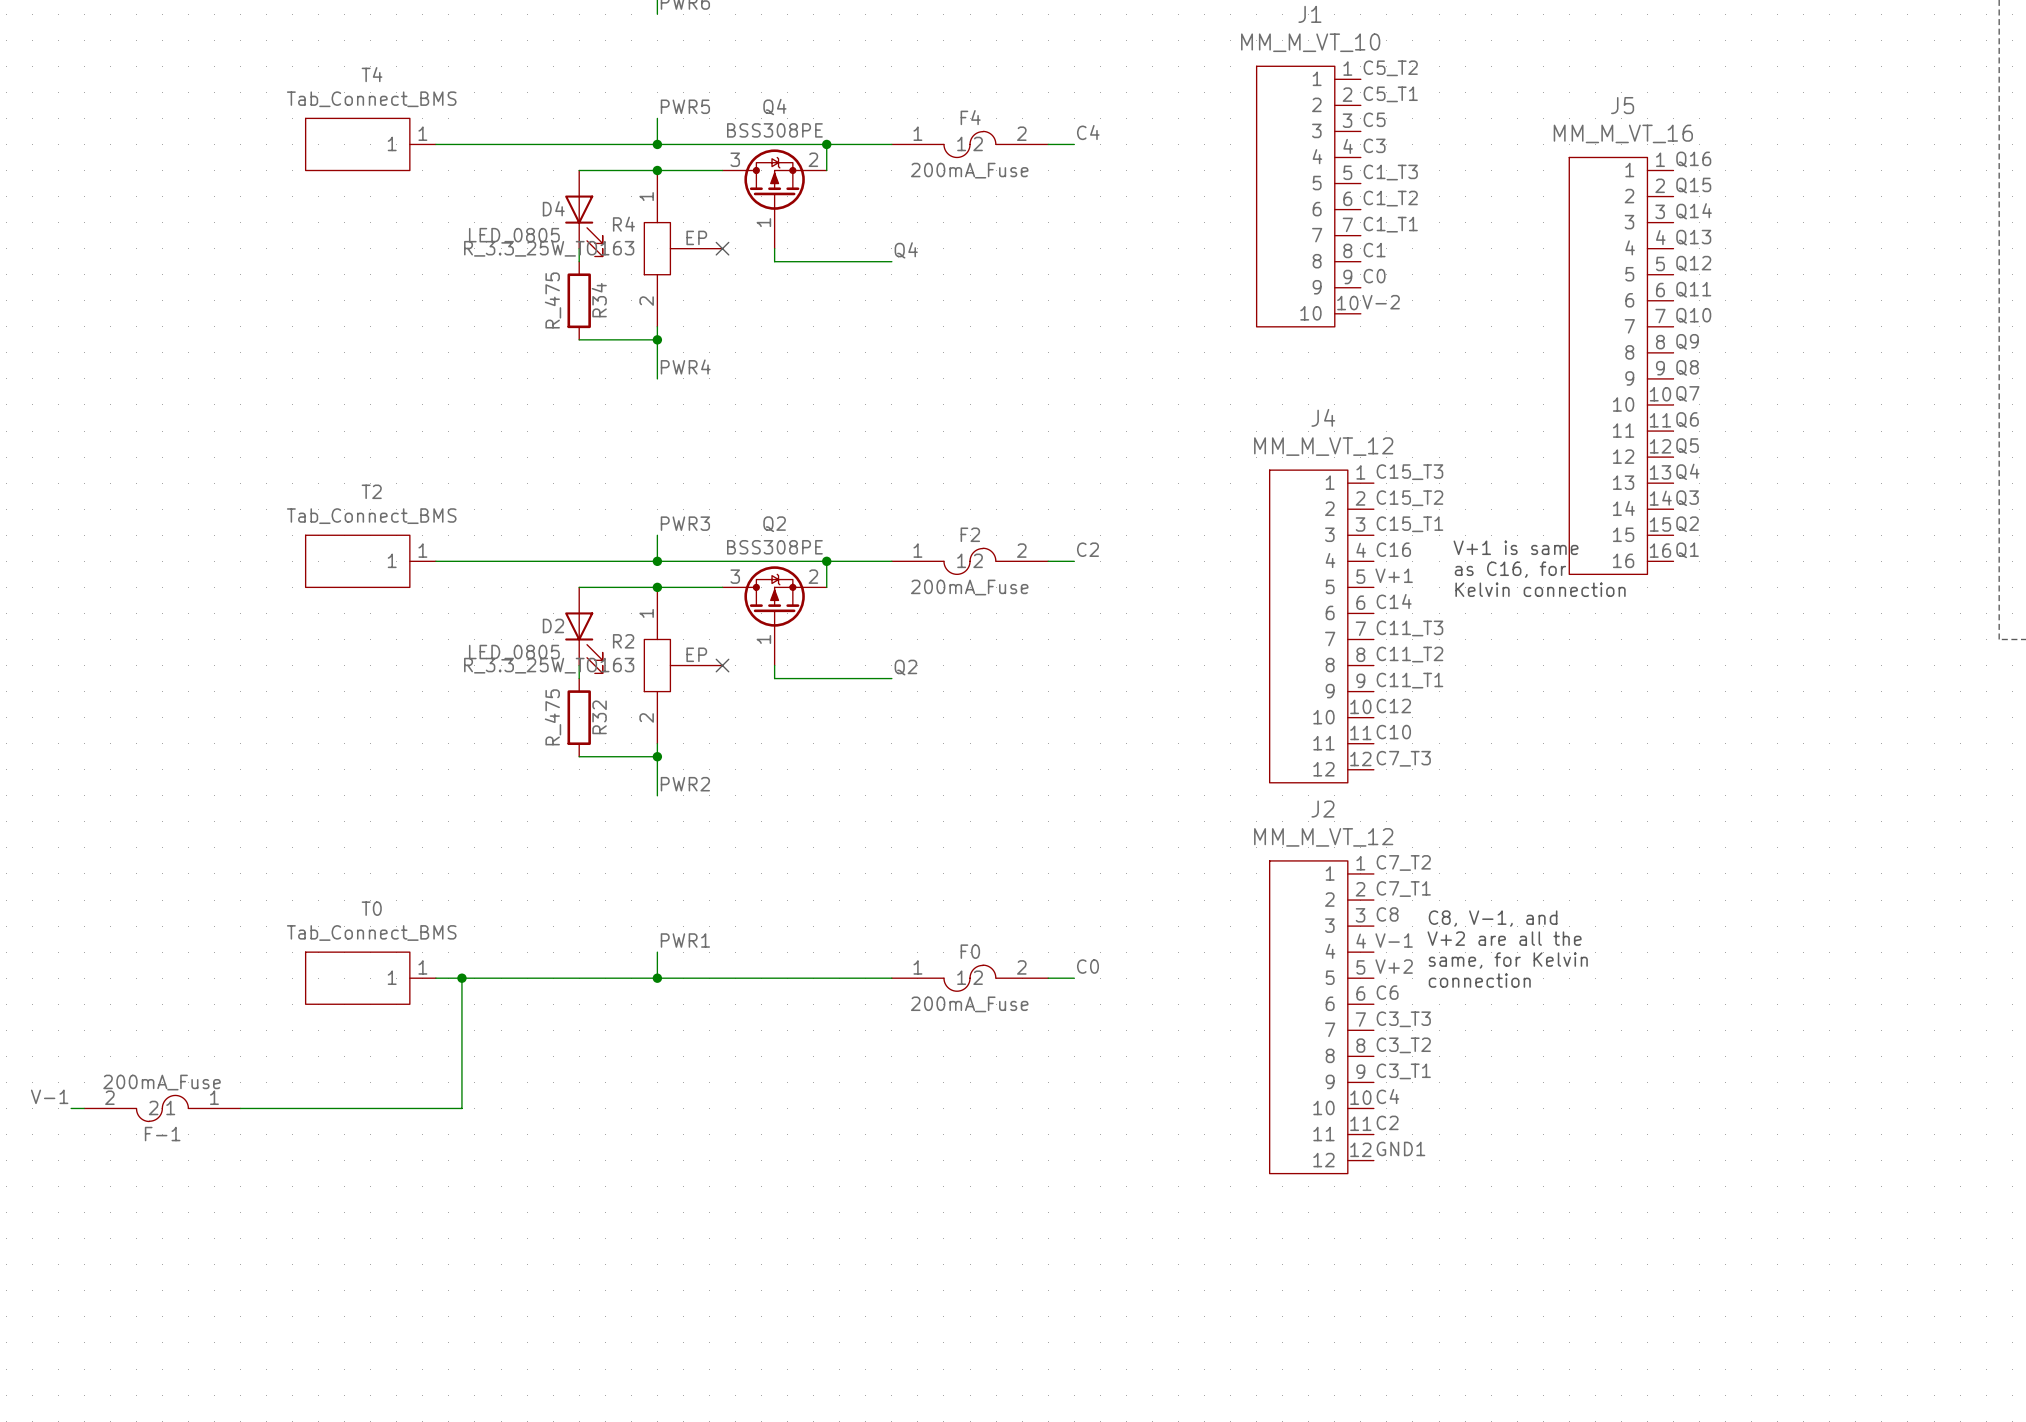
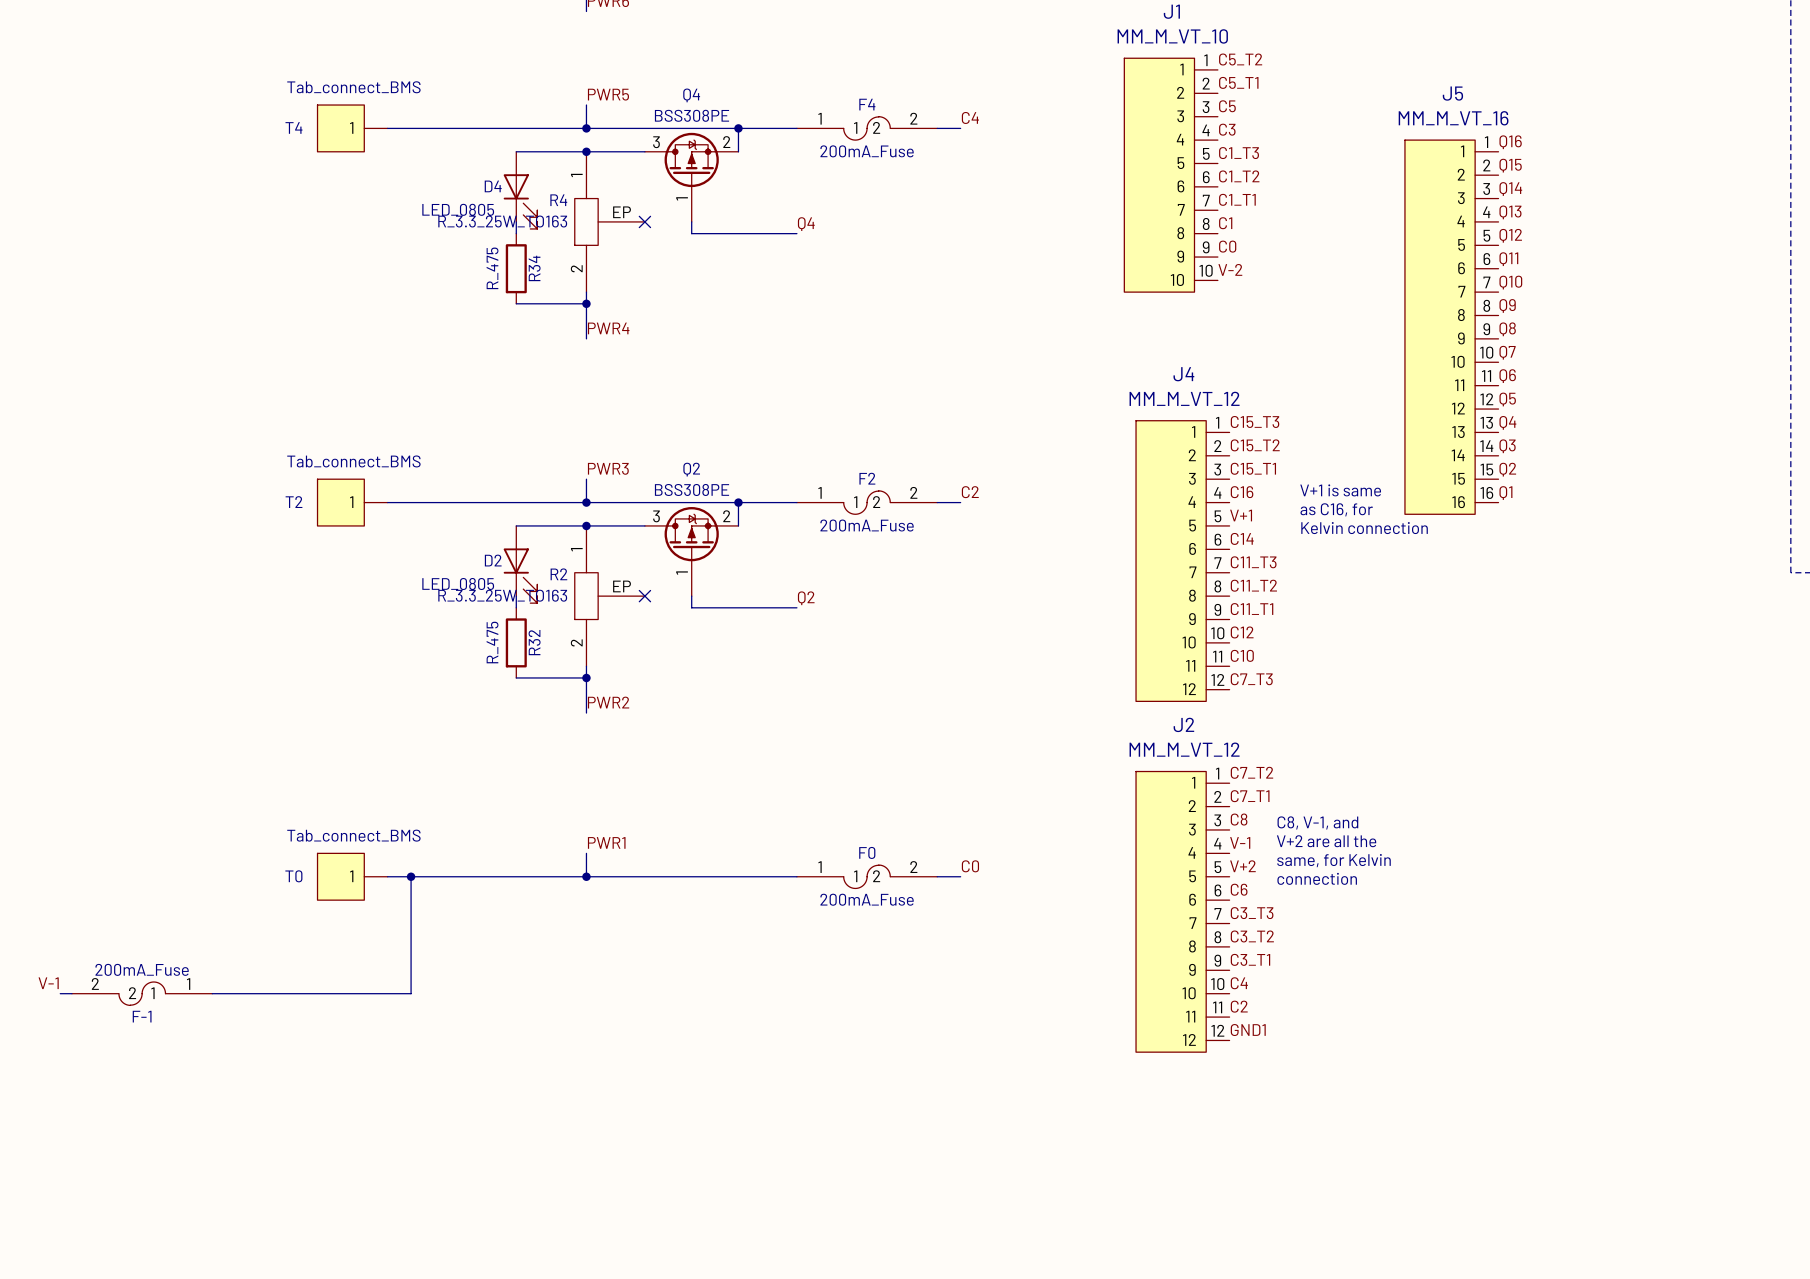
T4 name position: T4 (372, 74) -> T4 (293, 127)
T4 value: Tab_Connect_BMS (371, 99) -> Tab_connect_BMS (353, 87)
T4 symbol: [305, 118, 436, 171] -> [317, 105, 388, 152]
T2 name position: T2 (371, 491) -> T2 (294, 502)
T2 value: Tab_Connect_BMS (371, 516) -> Tab_connect_BMS (353, 461)
T2 symbol: [305, 535, 436, 588] -> [317, 479, 388, 526]
T0 name position: T0 (371, 908) -> T0 (293, 876)
T0 value: Tab_Connect_BMS (371, 932) -> Tab_connect_BMS (353, 835)
T0 symbol: [305, 952, 436, 1005] -> [317, 853, 388, 901]

